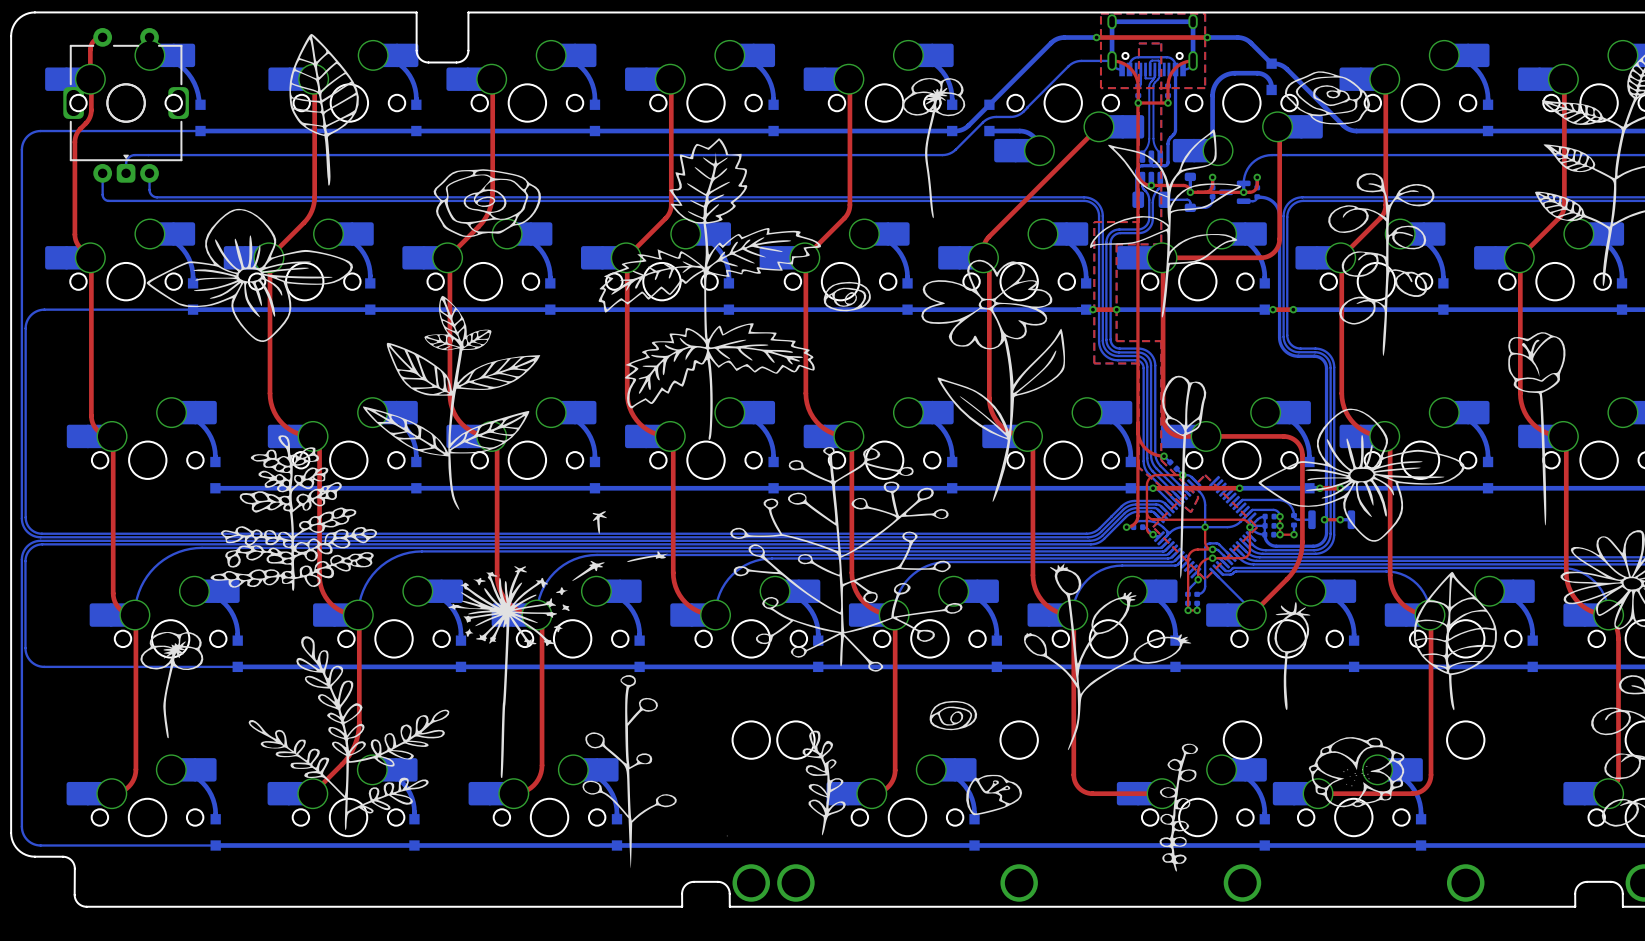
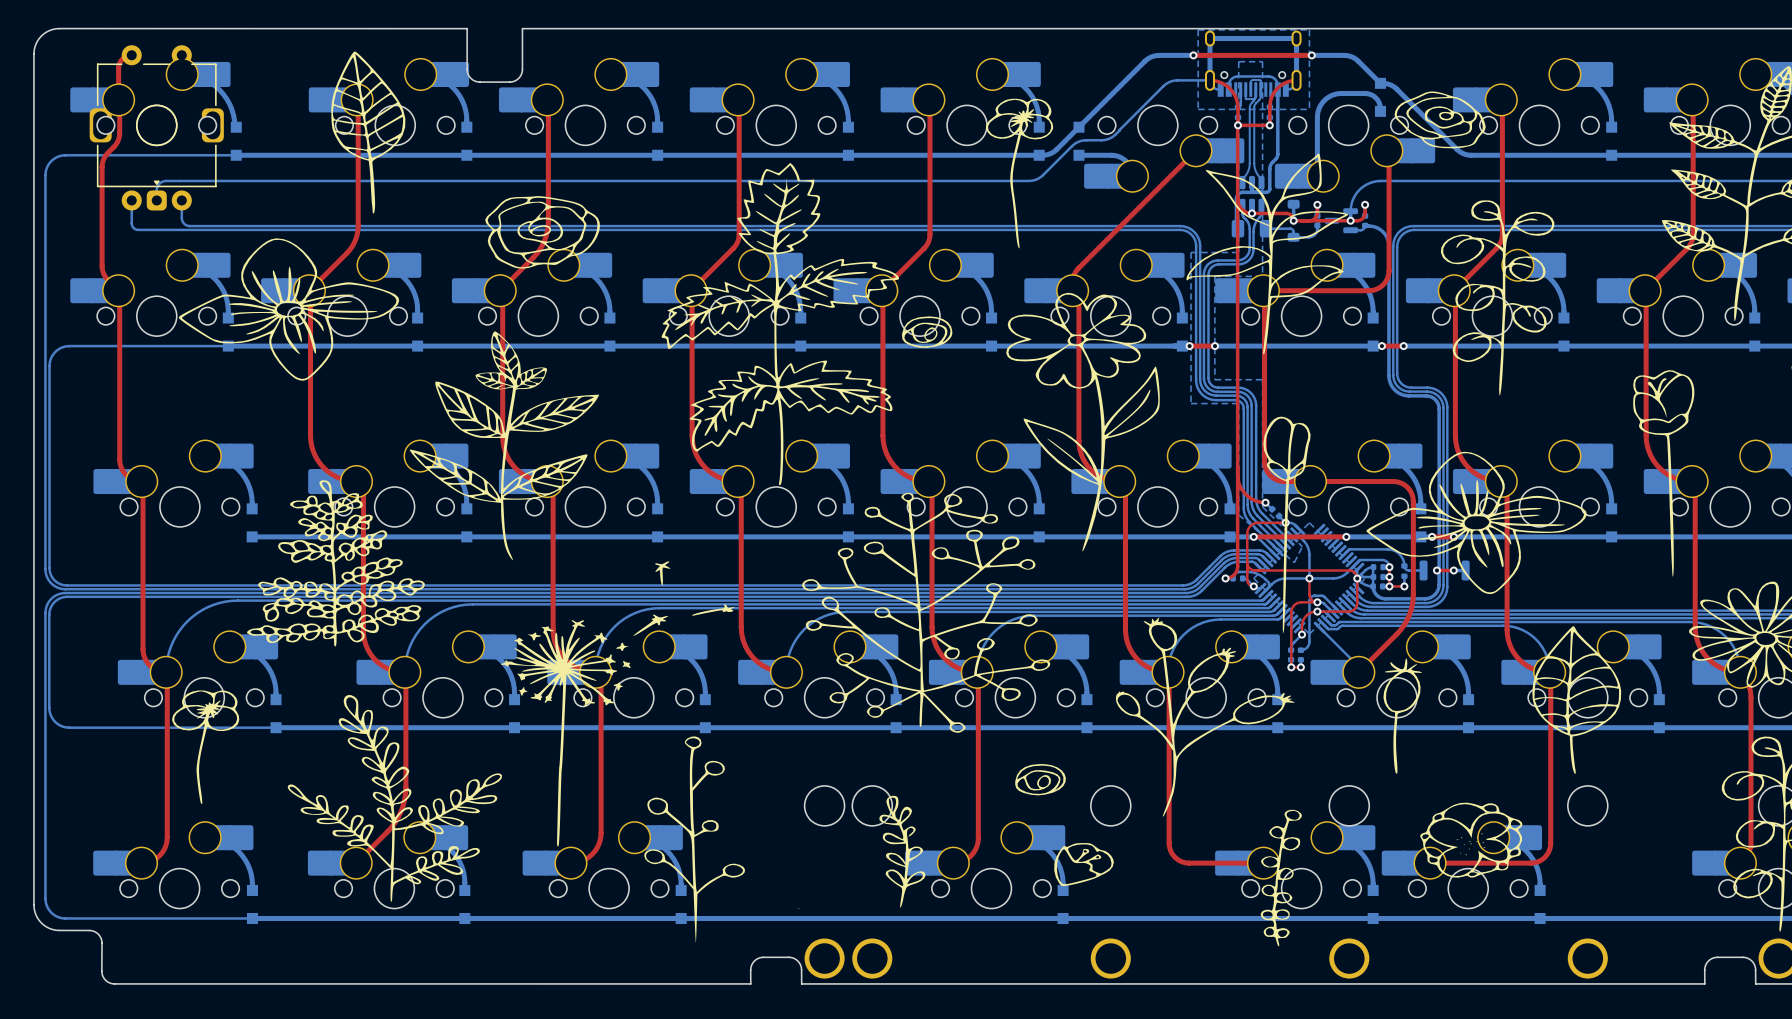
top zone outline: (1100, 13) (1205, 13) (1205, 88) (1100, 88) (1100, 13) -> none
top zone outline: (1138, 43) (1161, 43) (1161, 244) (1116, 244) (1116, 341) (1161, 341) (1161, 460) (1198, 497) (1191, 512) (1138, 467) (1138, 363) (1094, 363) (1094, 222) (1138, 222) (1138, 43) -> none
top zone outline: (1205, 475) (1153, 527) (1205, 579) (1257, 527) (1205, 475) -> none

